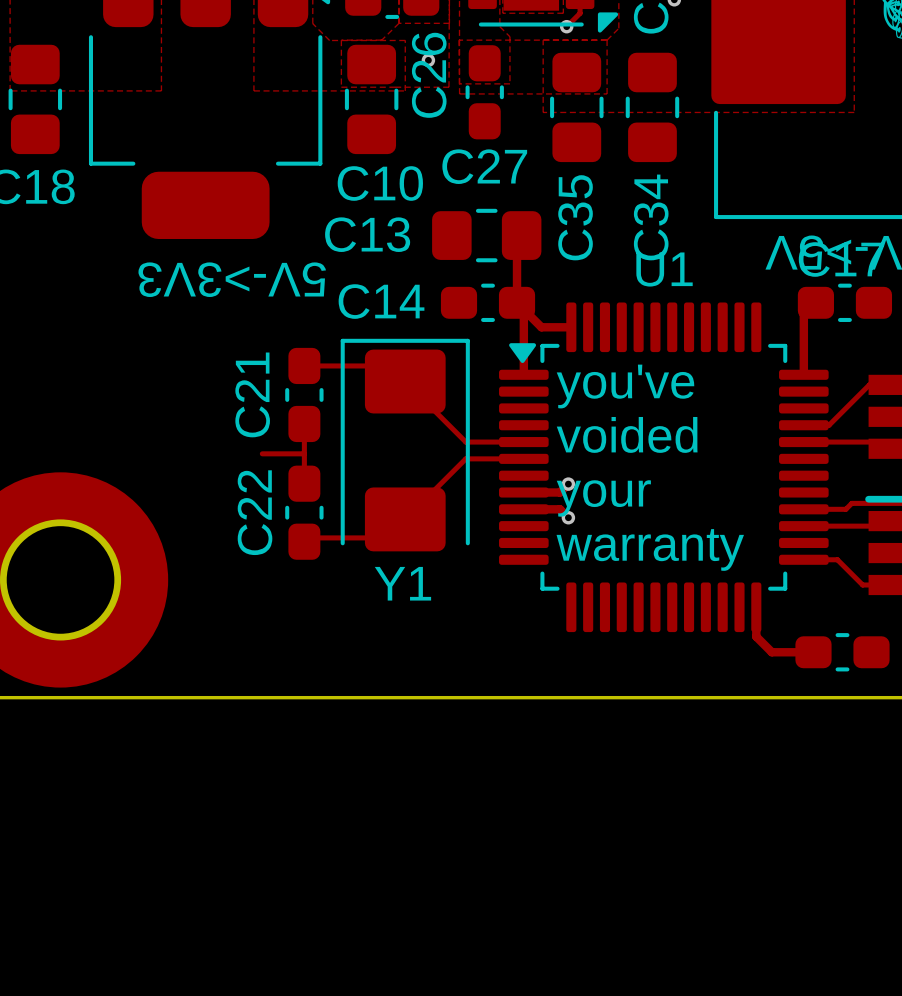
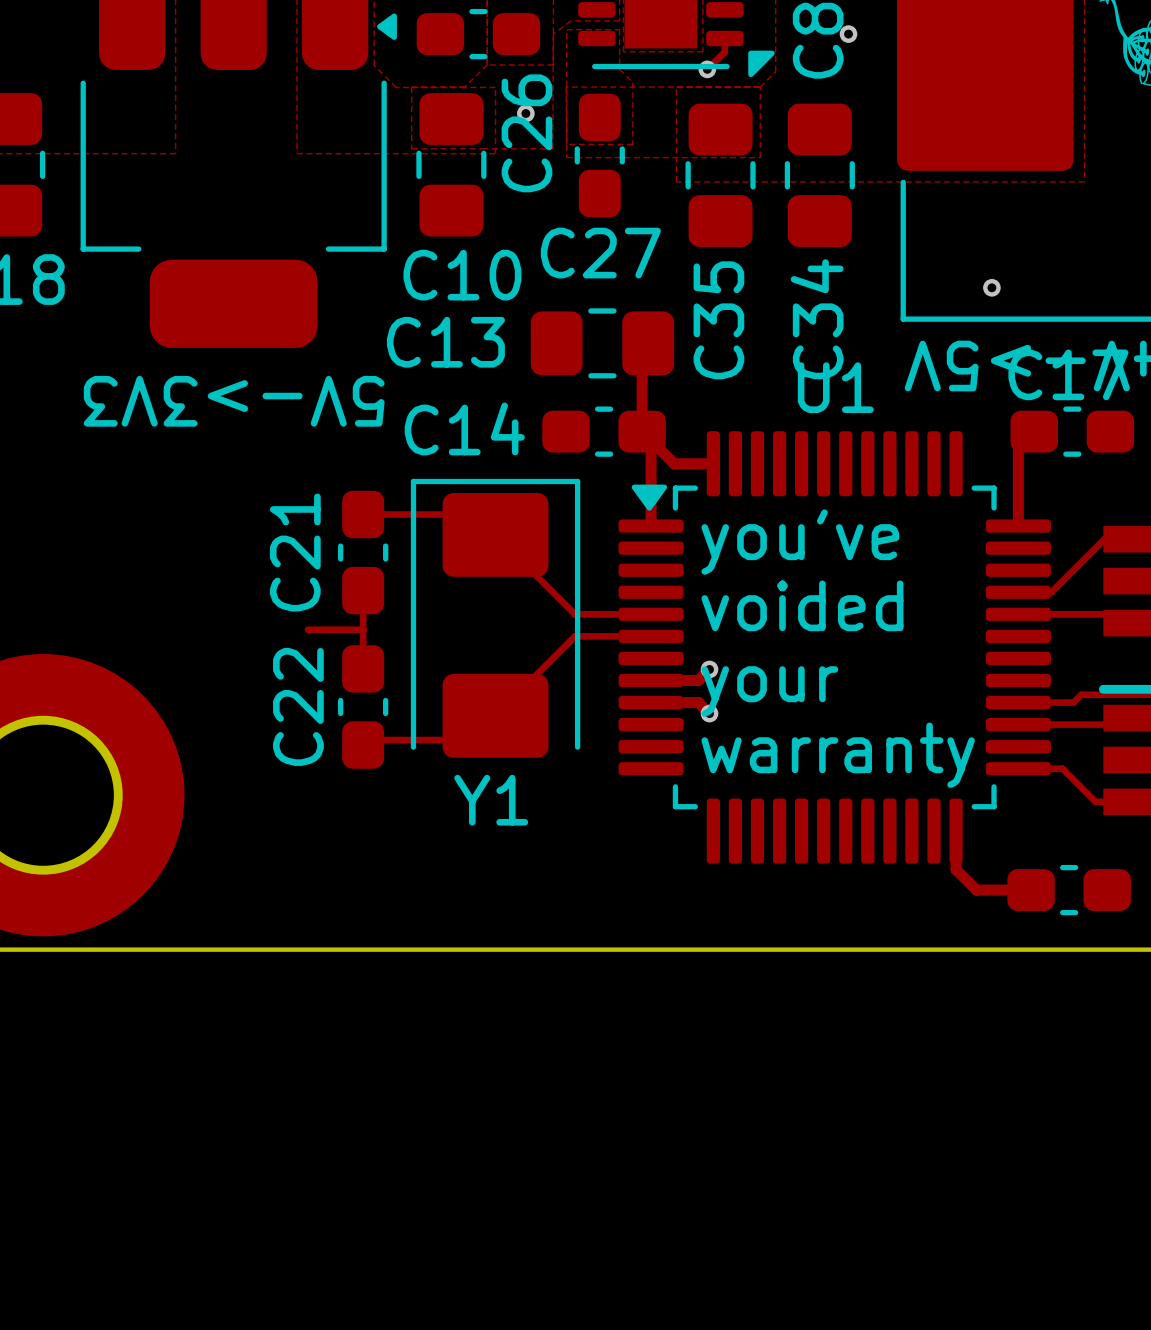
via: none -> (991, 287)

